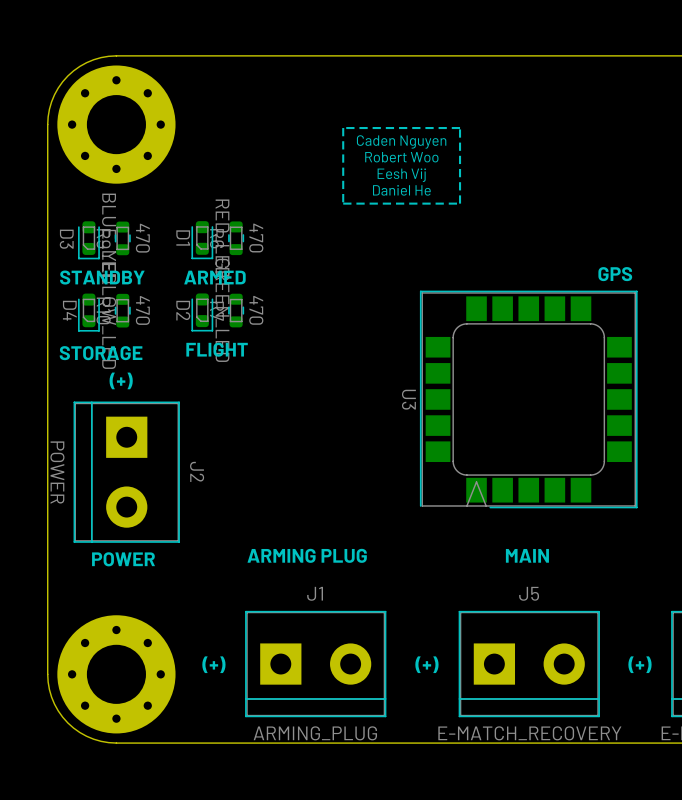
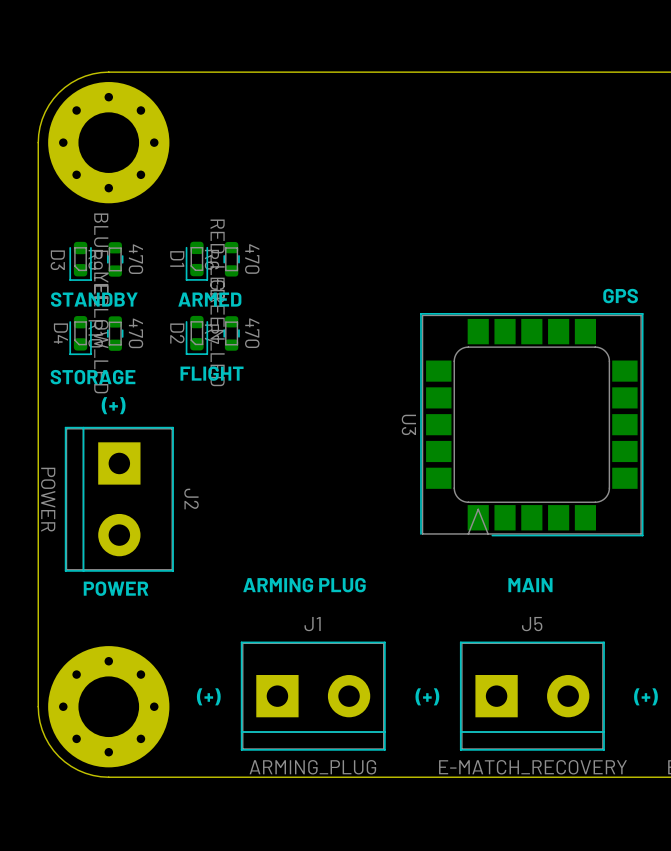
line: (460, 128) (343, 128) (343, 203) (460, 203) (460, 128) -> none
text: Caden Nguyen (401, 141) -> none
text: Robert Woo (401, 157) -> none
text: Eesh Vij (401, 175) -> none
text: Daniel He (401, 190) -> none

